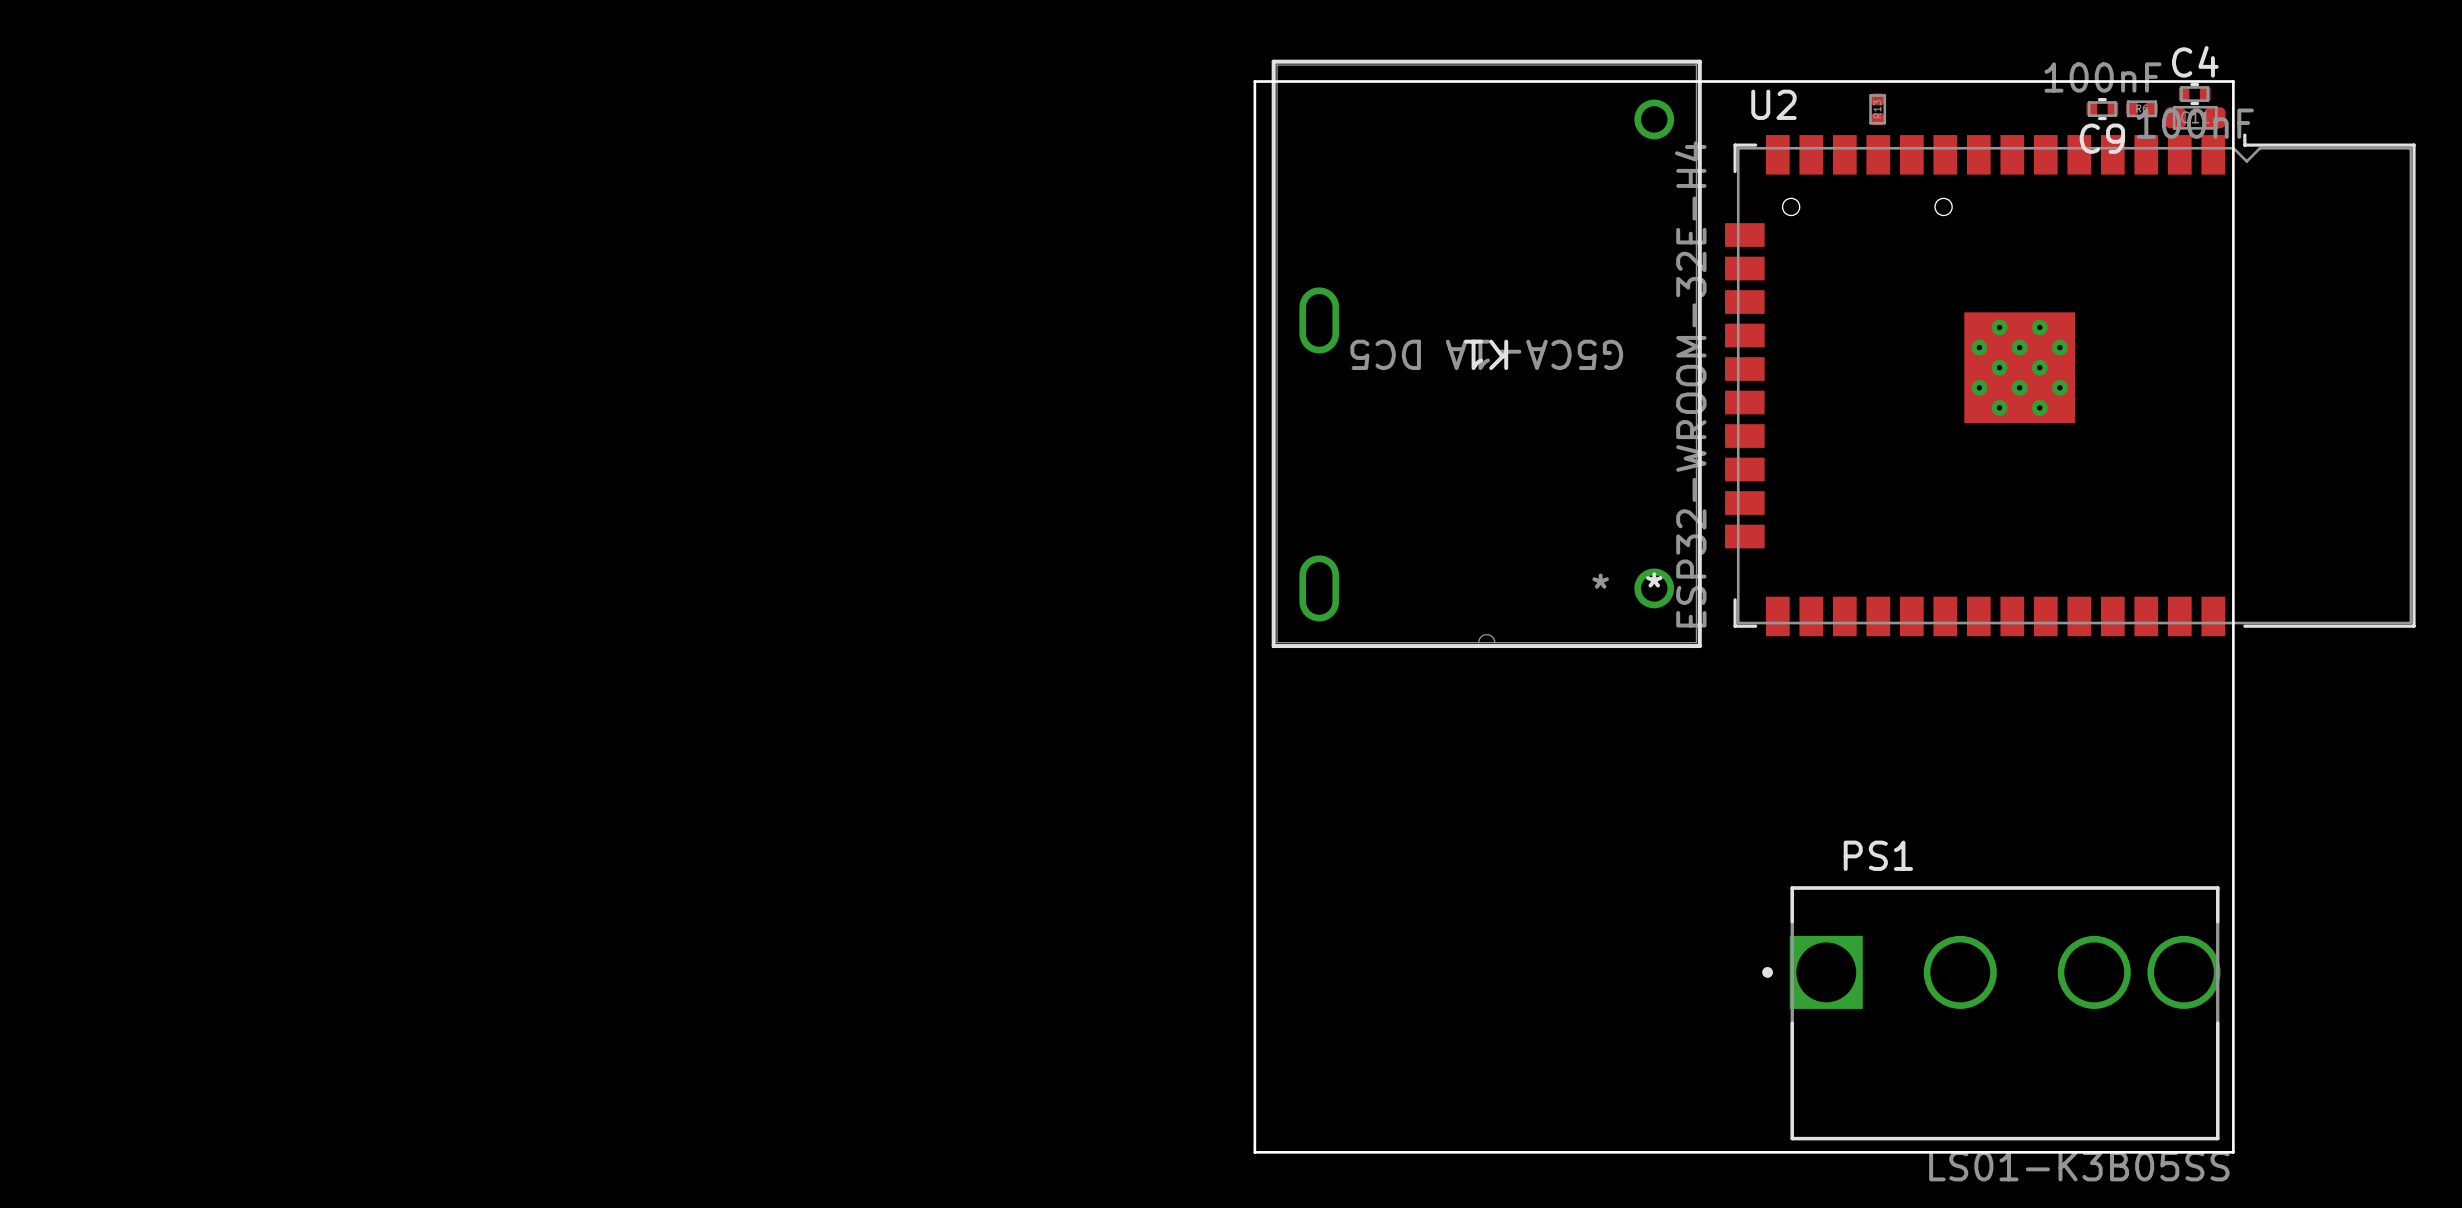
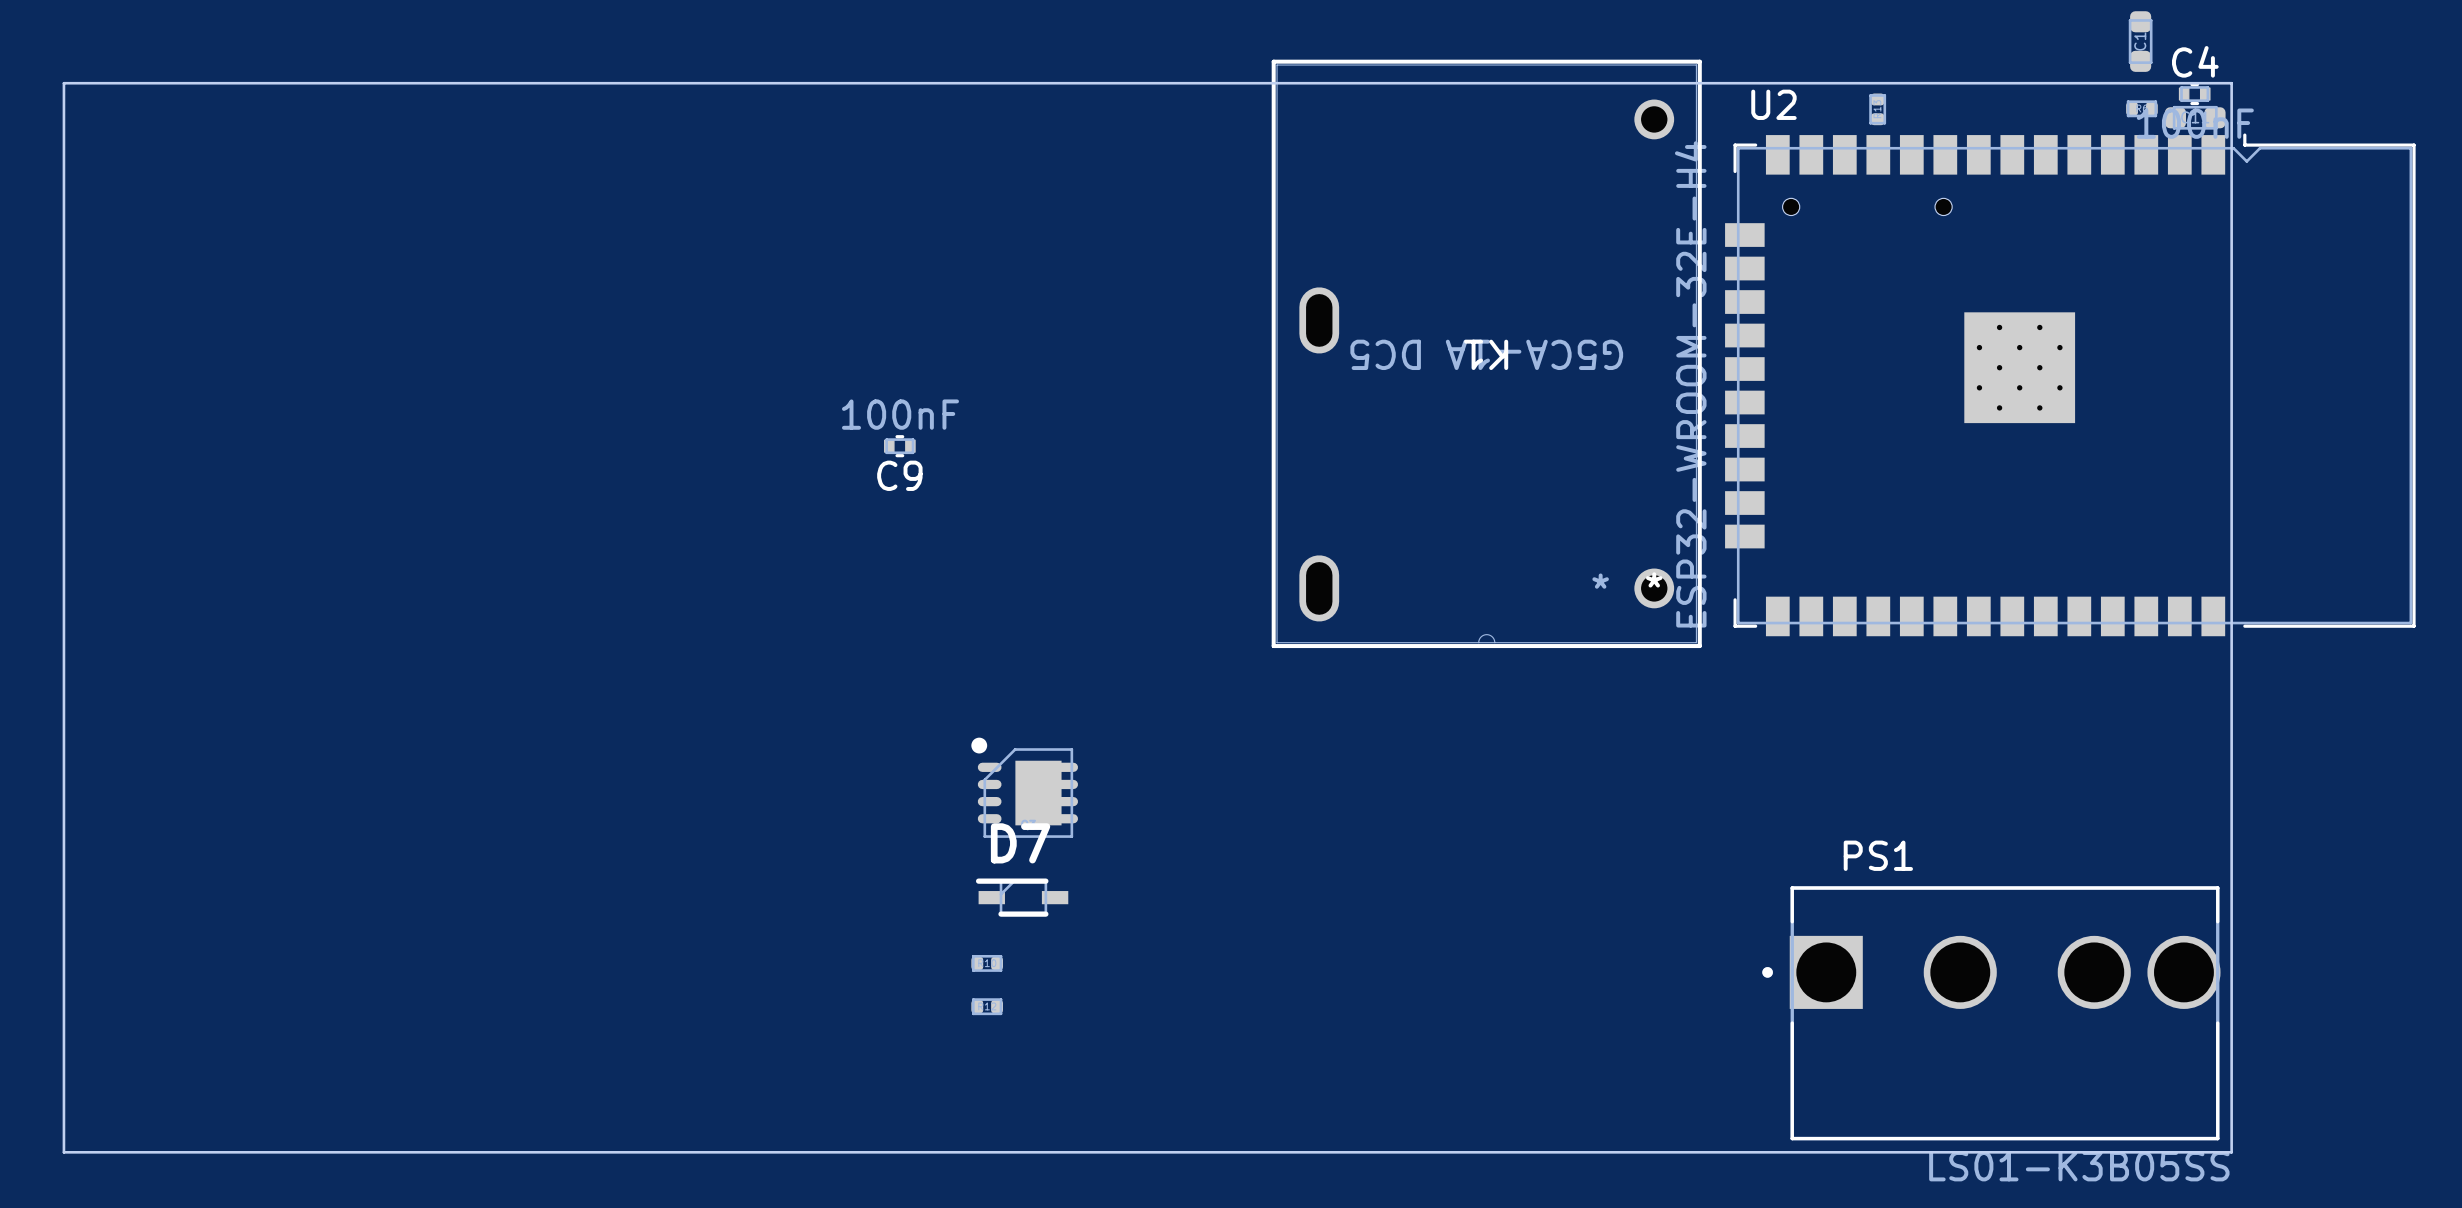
C1: none -> (2140, 41)
C9 position: (2102, 109) -> (899, 446)
part: none -> (1024, 787)
D7: none -> (1022, 897)
part: none -> (987, 963)
part: none -> (987, 1006)
board edge: (1254, 1152) (1254, 81) (2233, 81) (2233, 1152) (2231, 1152) -> (1254, 1152) (63, 1152) (63, 83) (2231, 83) (2231, 1152)

